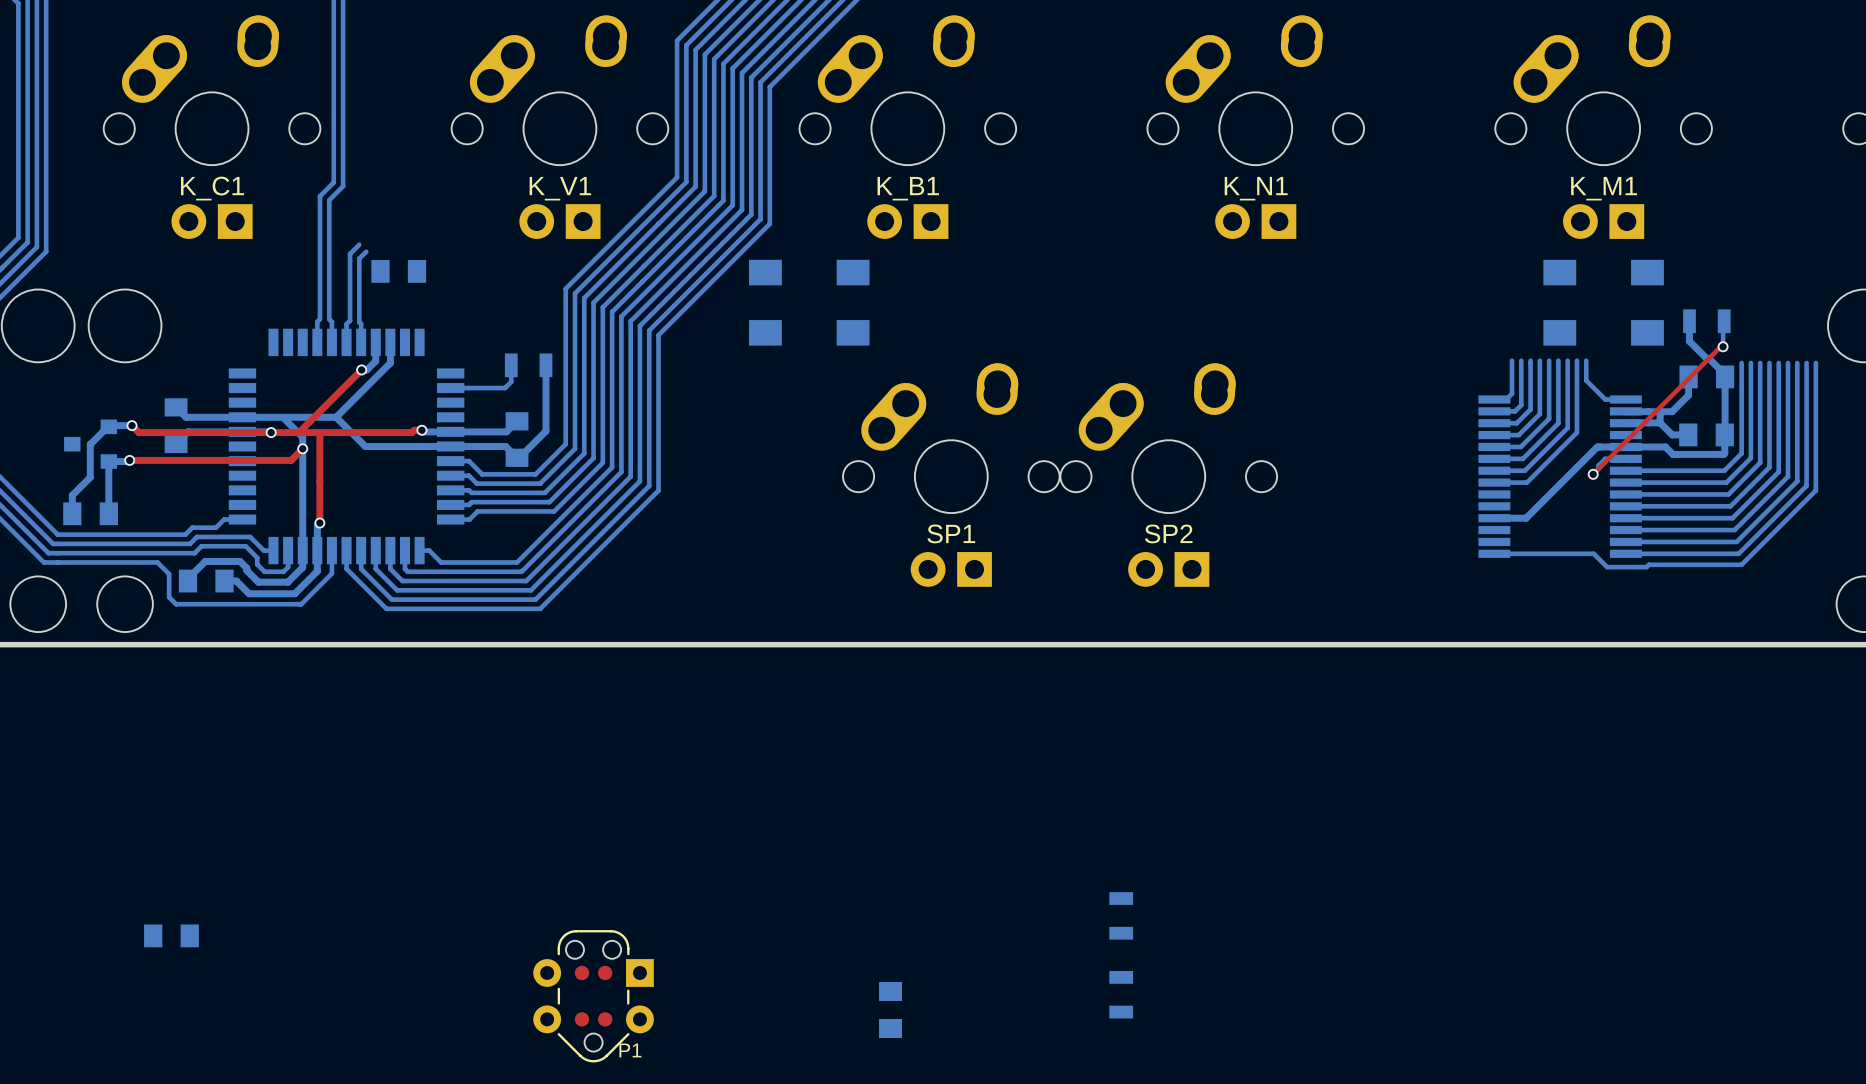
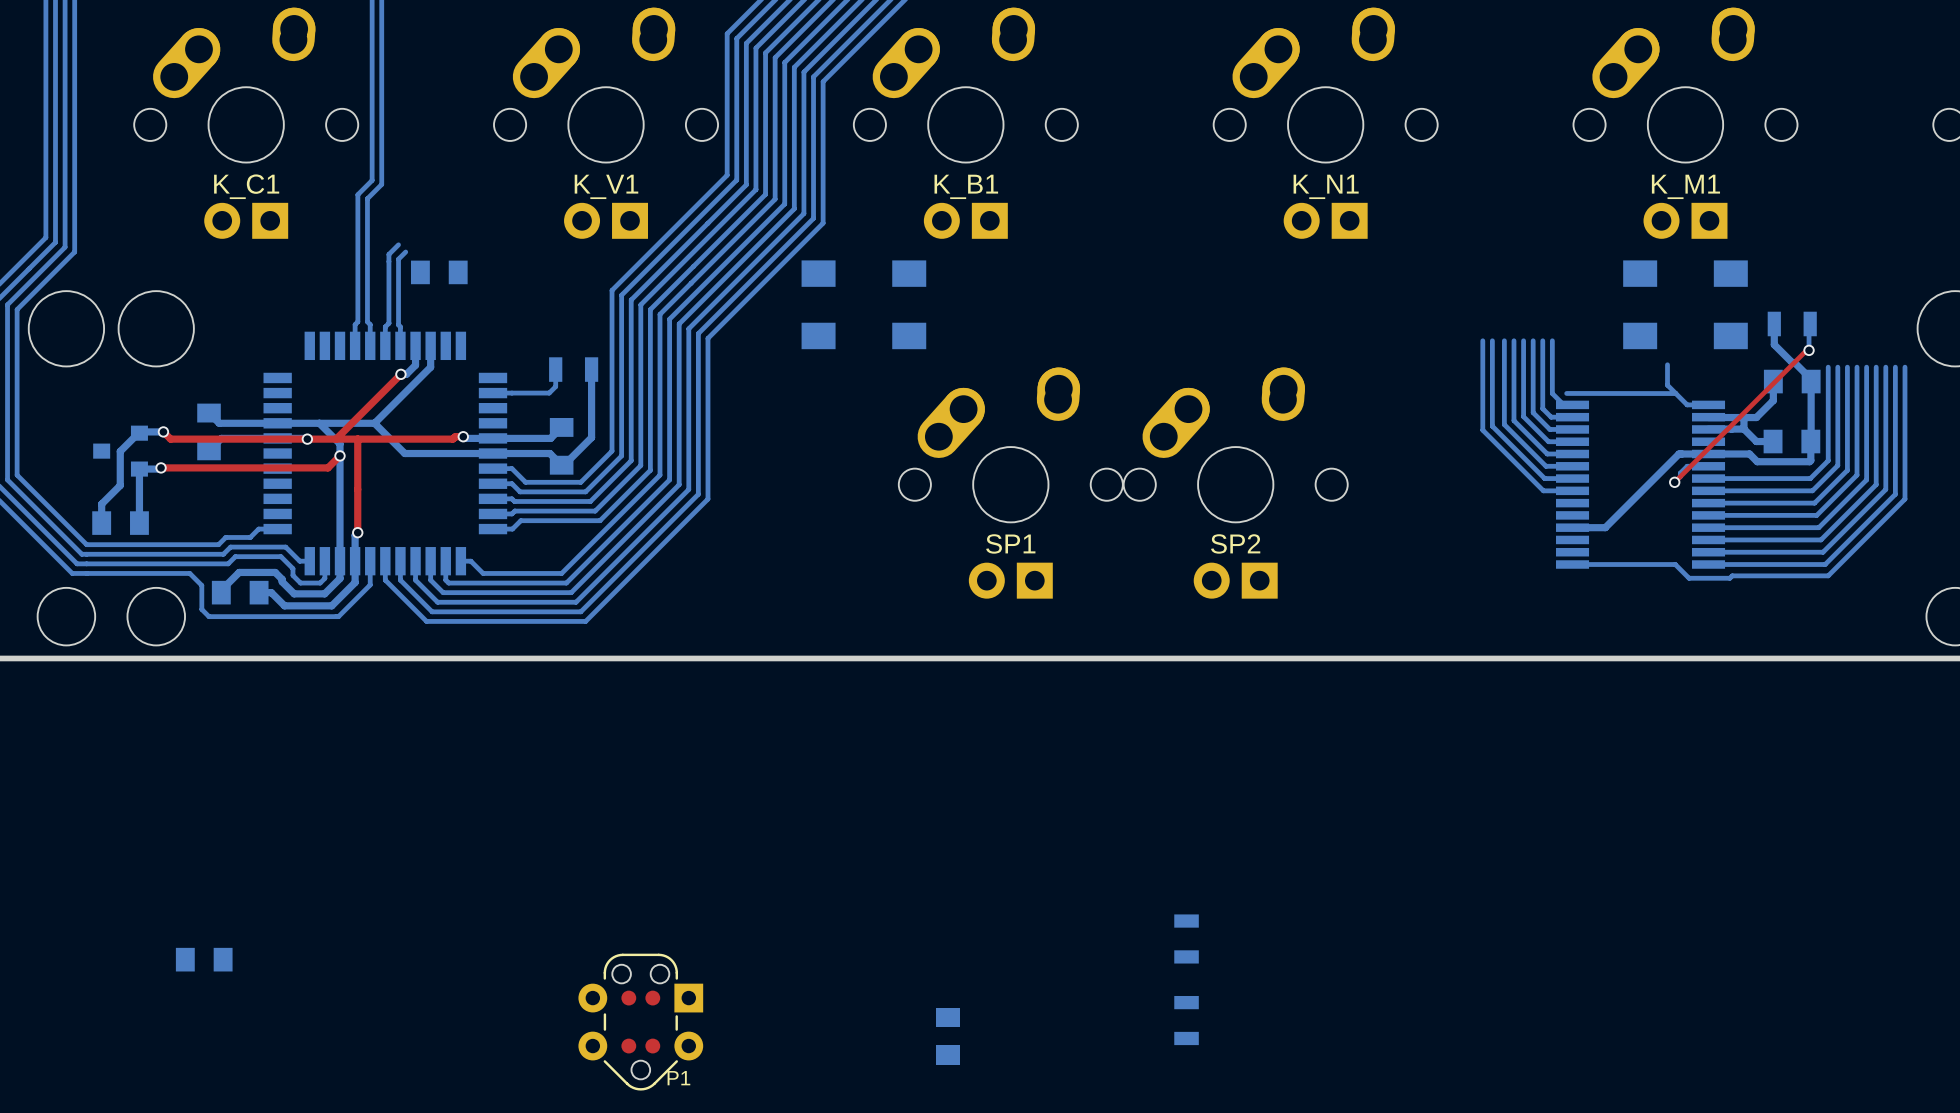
bottom track: (1512, 360) (1512, 393) (1506, 399) (1494, 399) -> (1552, 340) (1552, 393) (1563, 404) (1572, 404)
bottom track: (1521, 360) (1521, 405) (1515, 411) (1494, 411) -> (1542, 340) (1542, 408) (1551, 417) (1572, 417)
bottom track: (1530, 360) (1530, 409) (1516, 423) (1494, 423) -> (1533, 340) (1533, 412) (1549, 429) (1572, 429)
bottom track: (1539, 360) (1539, 414) (1518, 435) (1494, 435) -> (1523, 340) (1523, 416) (1548, 441) (1572, 441)
bottom track: (1549, 360) (1549, 418) (1520, 446) (1494, 446) -> (1513, 340) (1513, 420) (1547, 454) (1572, 454)
bottom track: (1558, 360) (1558, 423) (1522, 458) (1494, 458) -> (1504, 340) (1504, 424) (1546, 466) (1572, 466)
bottom track: (1567, 360) (1567, 427) (1524, 470) (1494, 470) -> (1492, 340) (1492, 426) (1544, 478) (1572, 478)
bottom track: (1576, 360) (1576, 432) (1526, 482) (1494, 482) -> (1482, 340) (1482, 430) (1543, 490) (1572, 490)
bottom track: none -> (1566, 393) (1675, 393)

